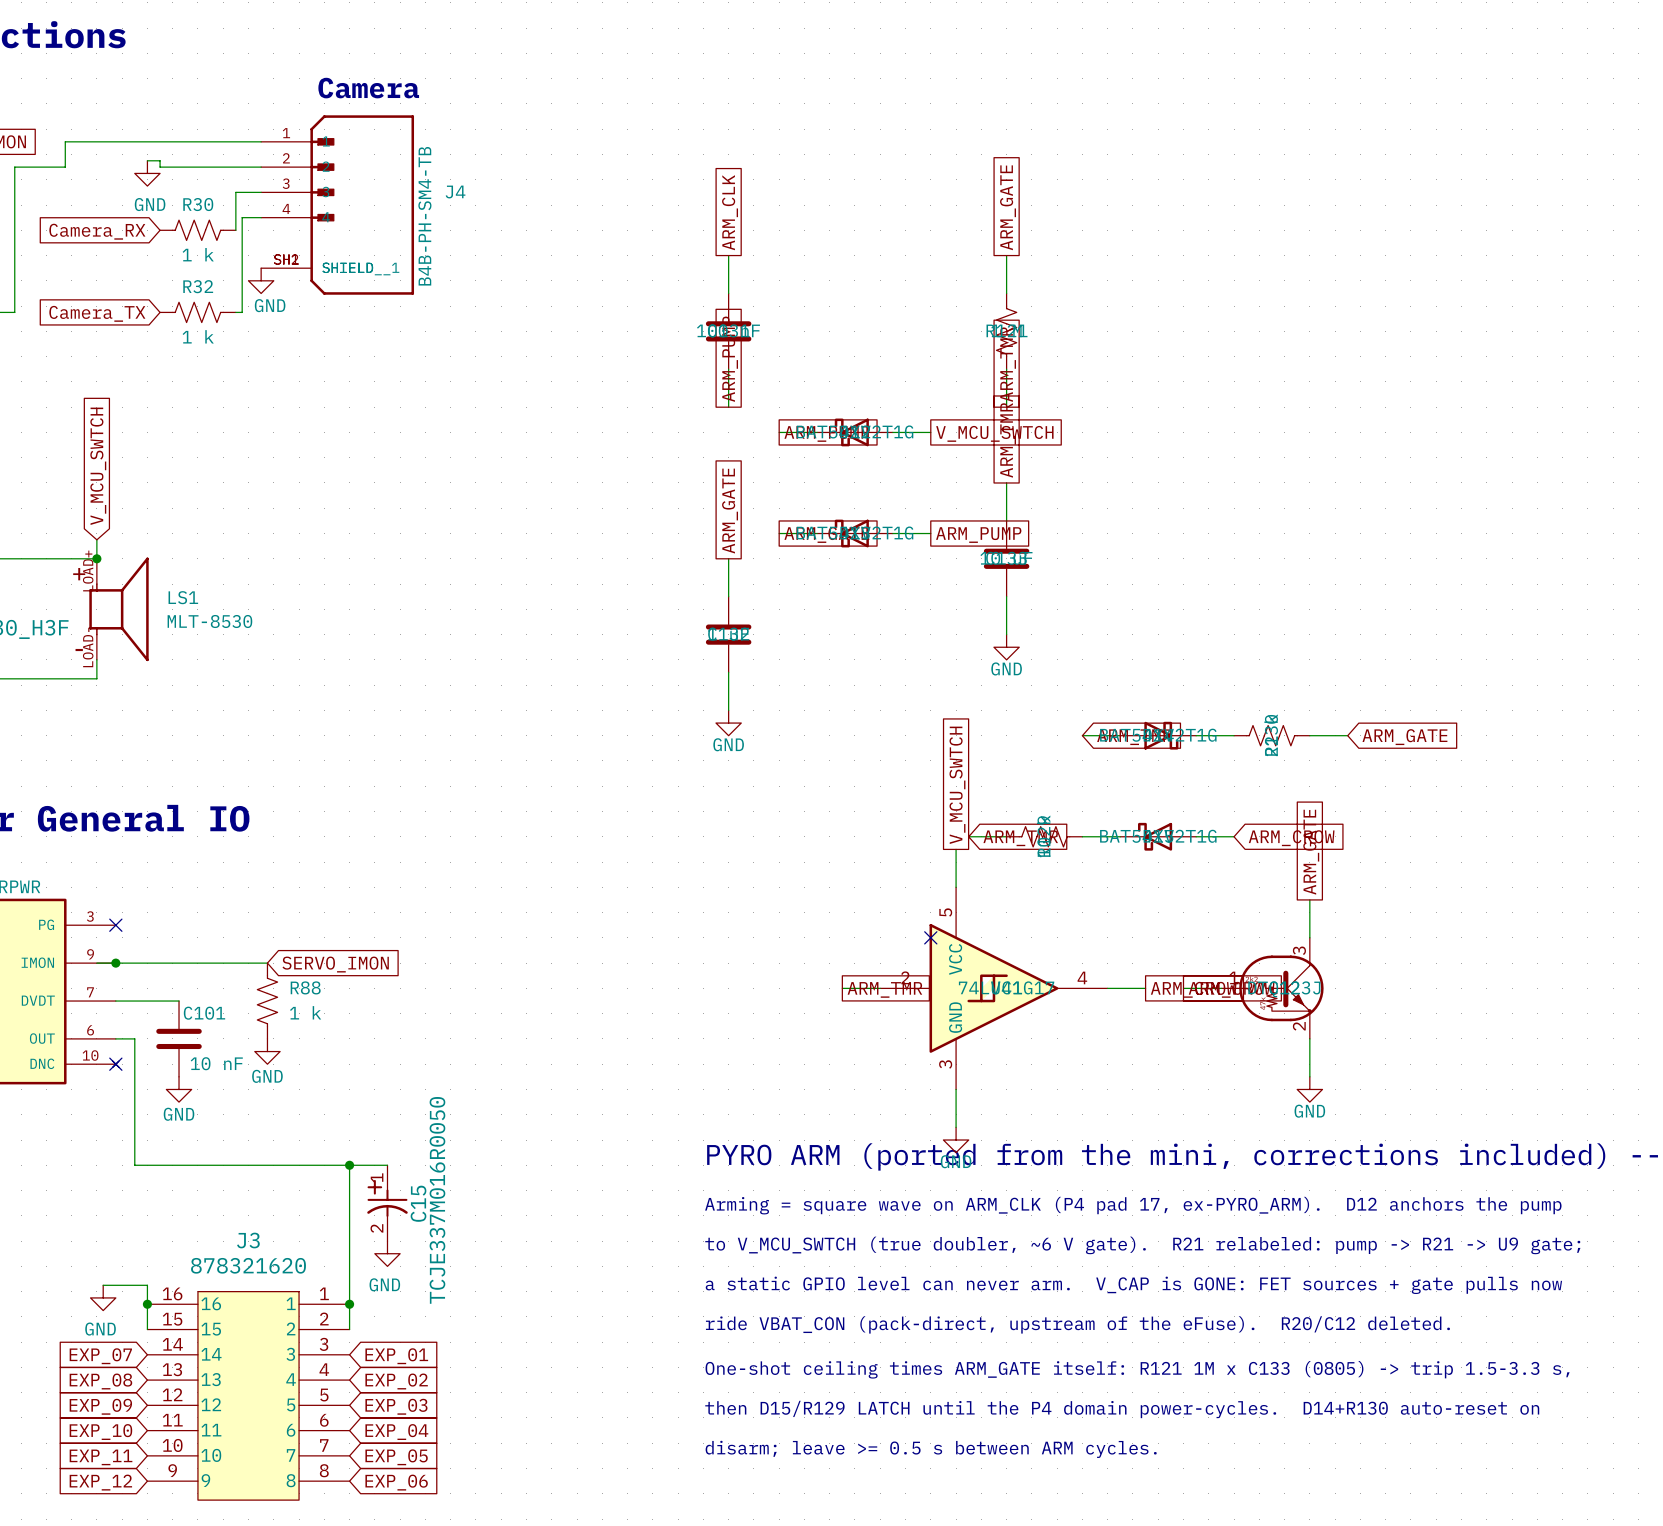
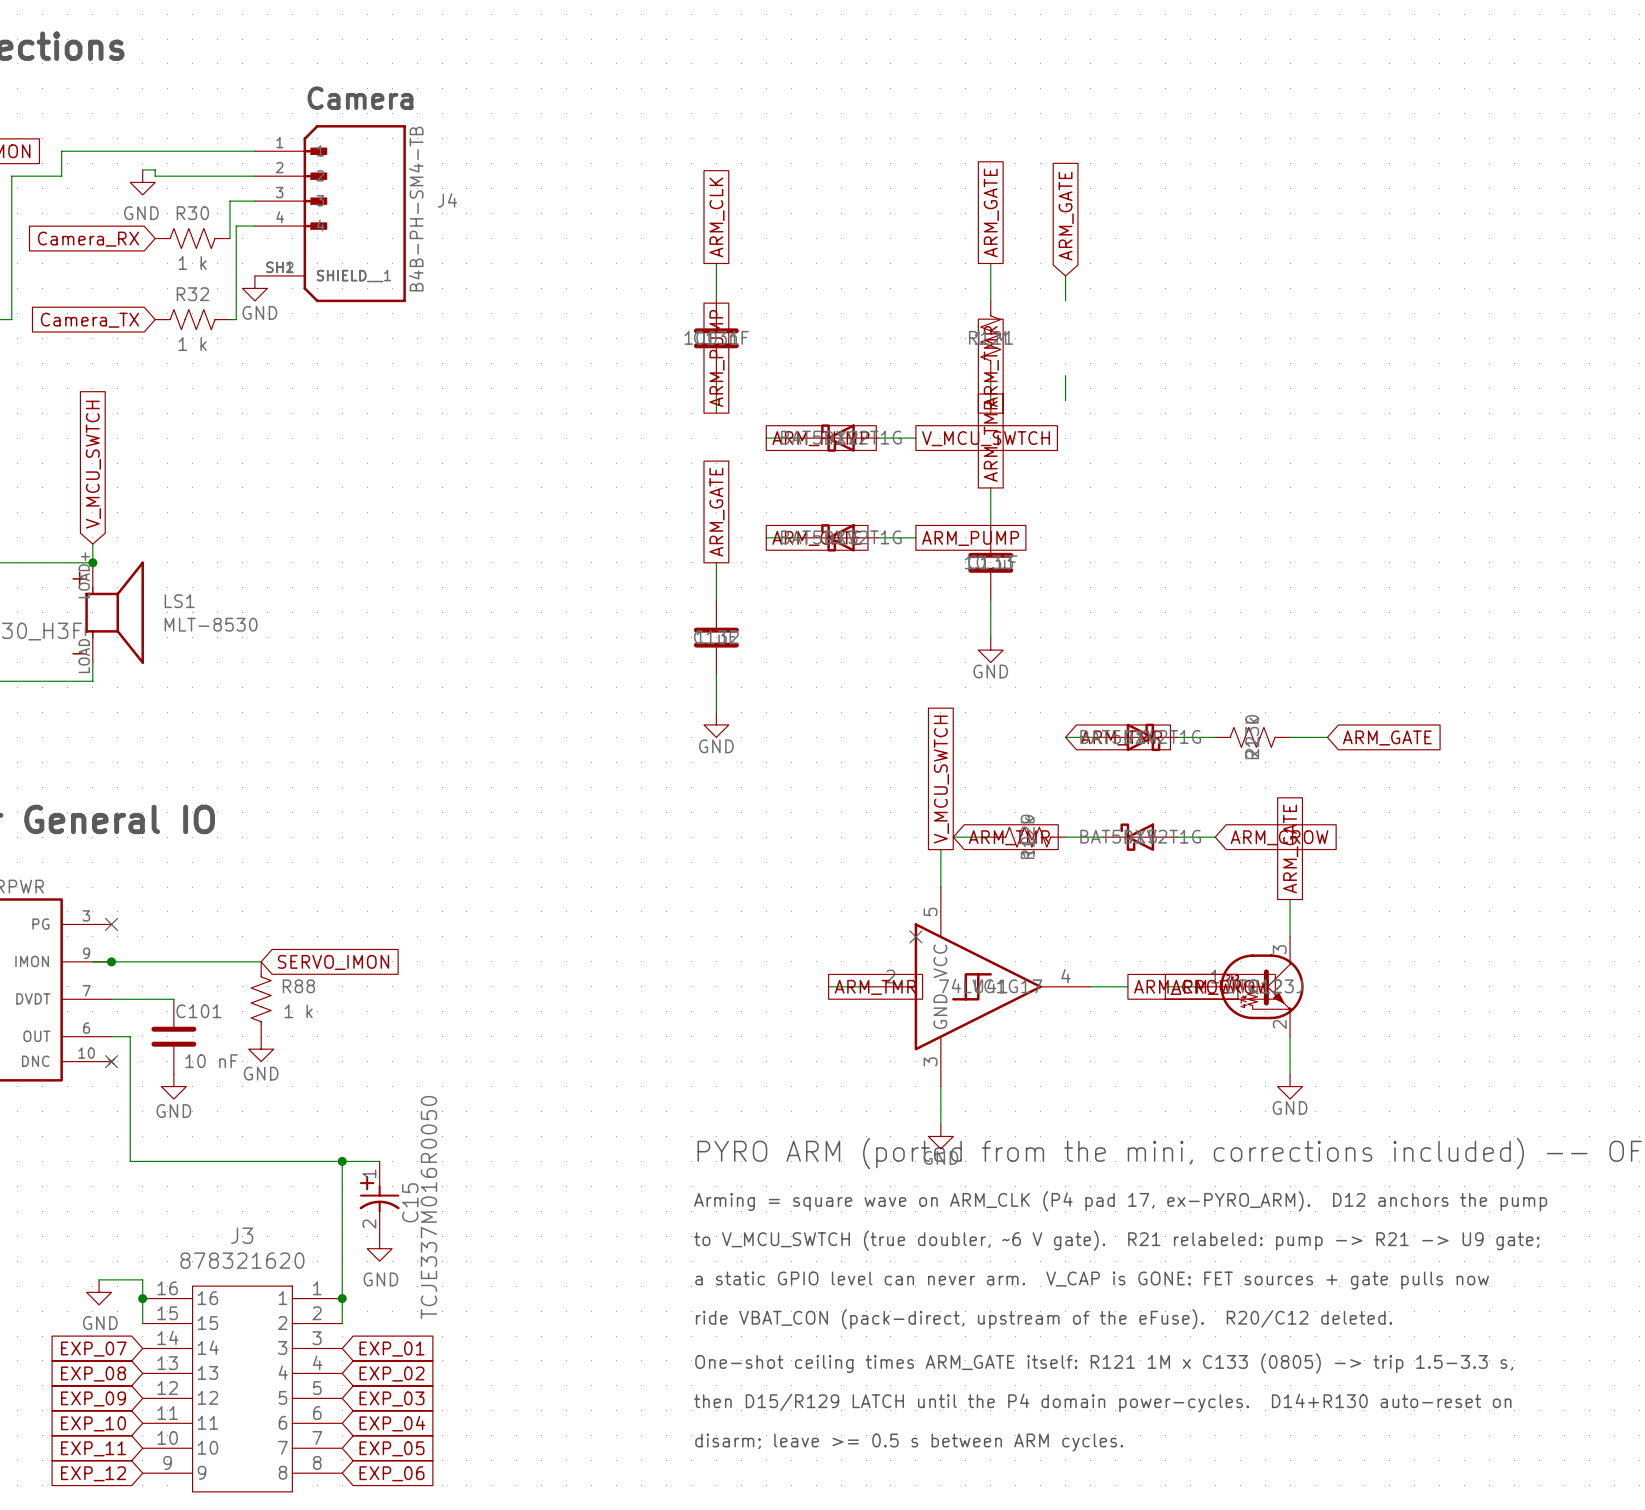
global label: none -> ARM_GATE (1066, 216)
wire: none -> (1065, 275) (1065, 300)
wire: none -> (1065, 375) (1065, 400)

